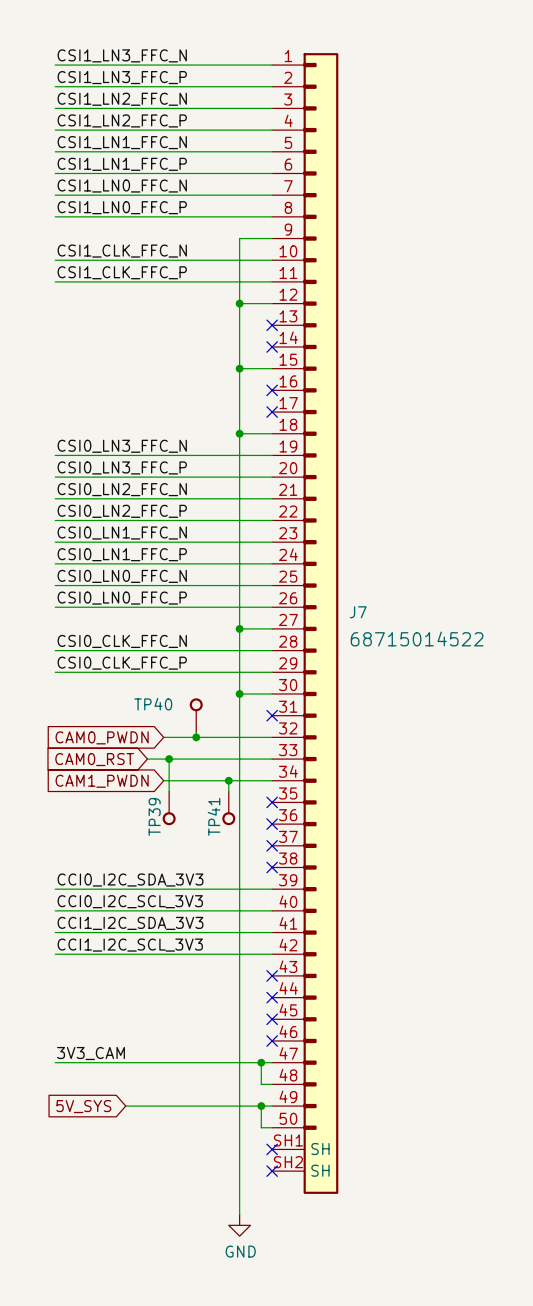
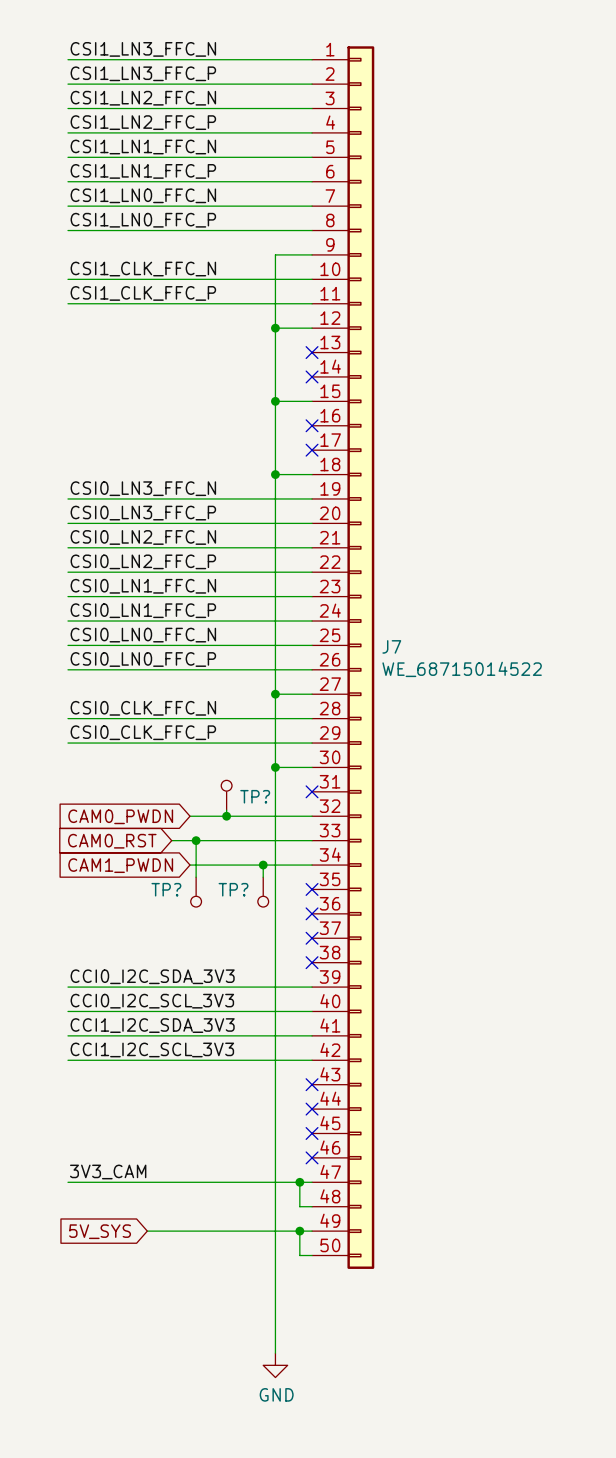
J7 symbol: [272, 53, 339, 1194] -> [312, 46, 375, 1269]
J7 value: none -> WE_68715014522 (462, 669)
J7 text: 68715014522 (417, 638) -> none
TP40: (196, 715) -> none
TP?: none -> (226, 795)
TP?: none -> (196, 892)
TP?: none -> (263, 892)
TP39: (169, 808) -> none
TP41: (228, 808) -> none
no-connect mark: (272, 1149) -> none
no-connect mark: (272, 1171) -> none

